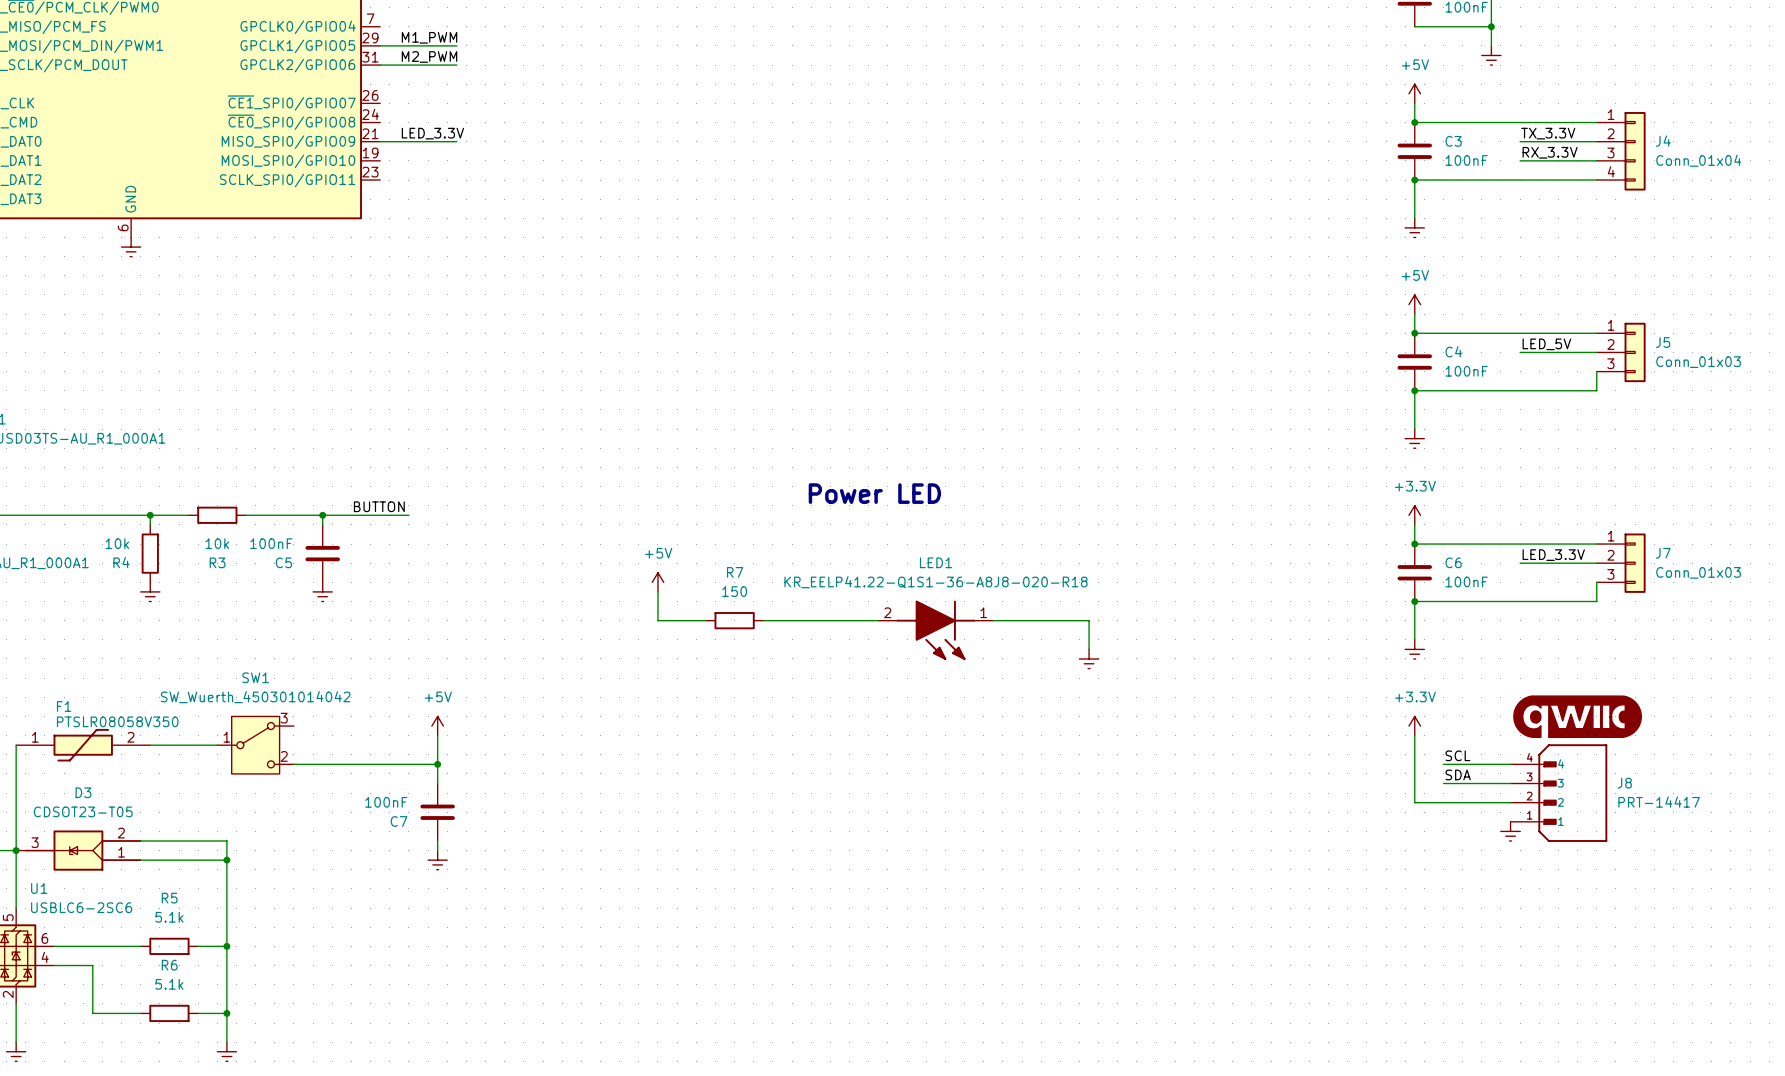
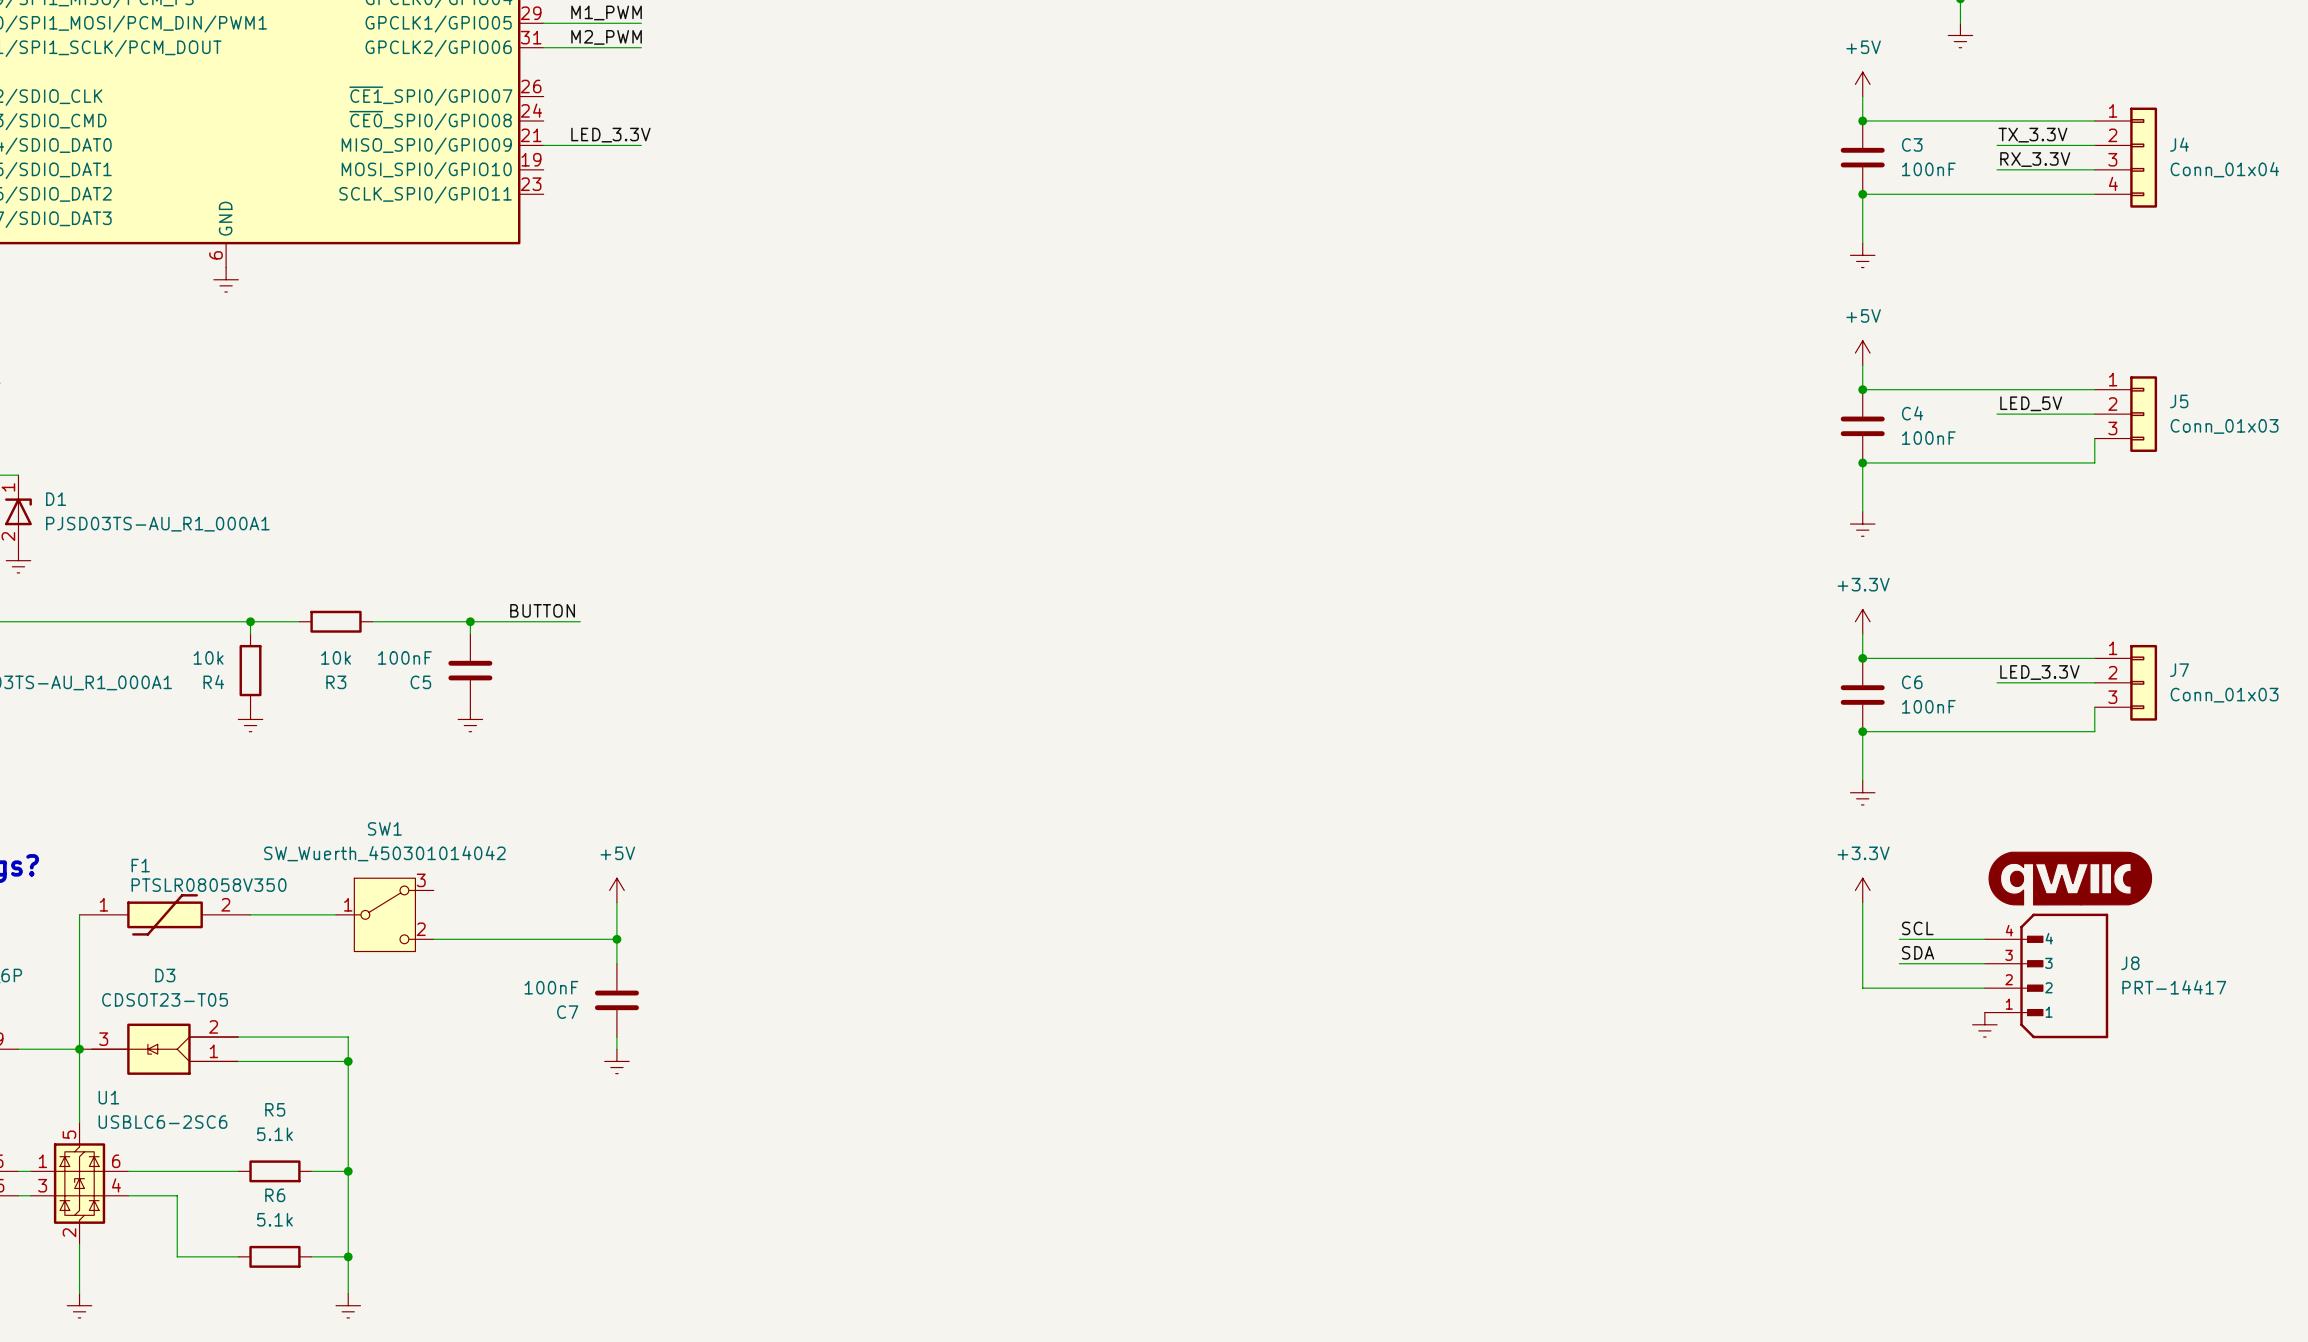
text: Power LED (874, 493) -> none
power symbol: +5V (657, 582) -> none
wire: (657, 591) (657, 620) (705, 620) -> none
R7: 150 (734, 620) -> none
wire: (763, 620) (878, 620) -> none
wire: (993, 620) (1089, 620) (1089, 649) -> none
LED1: KR_EELP41.22-Q1S1-36-A8J8-020-R18 (935, 630) -> none
power symbol: (1089, 658) -> none

